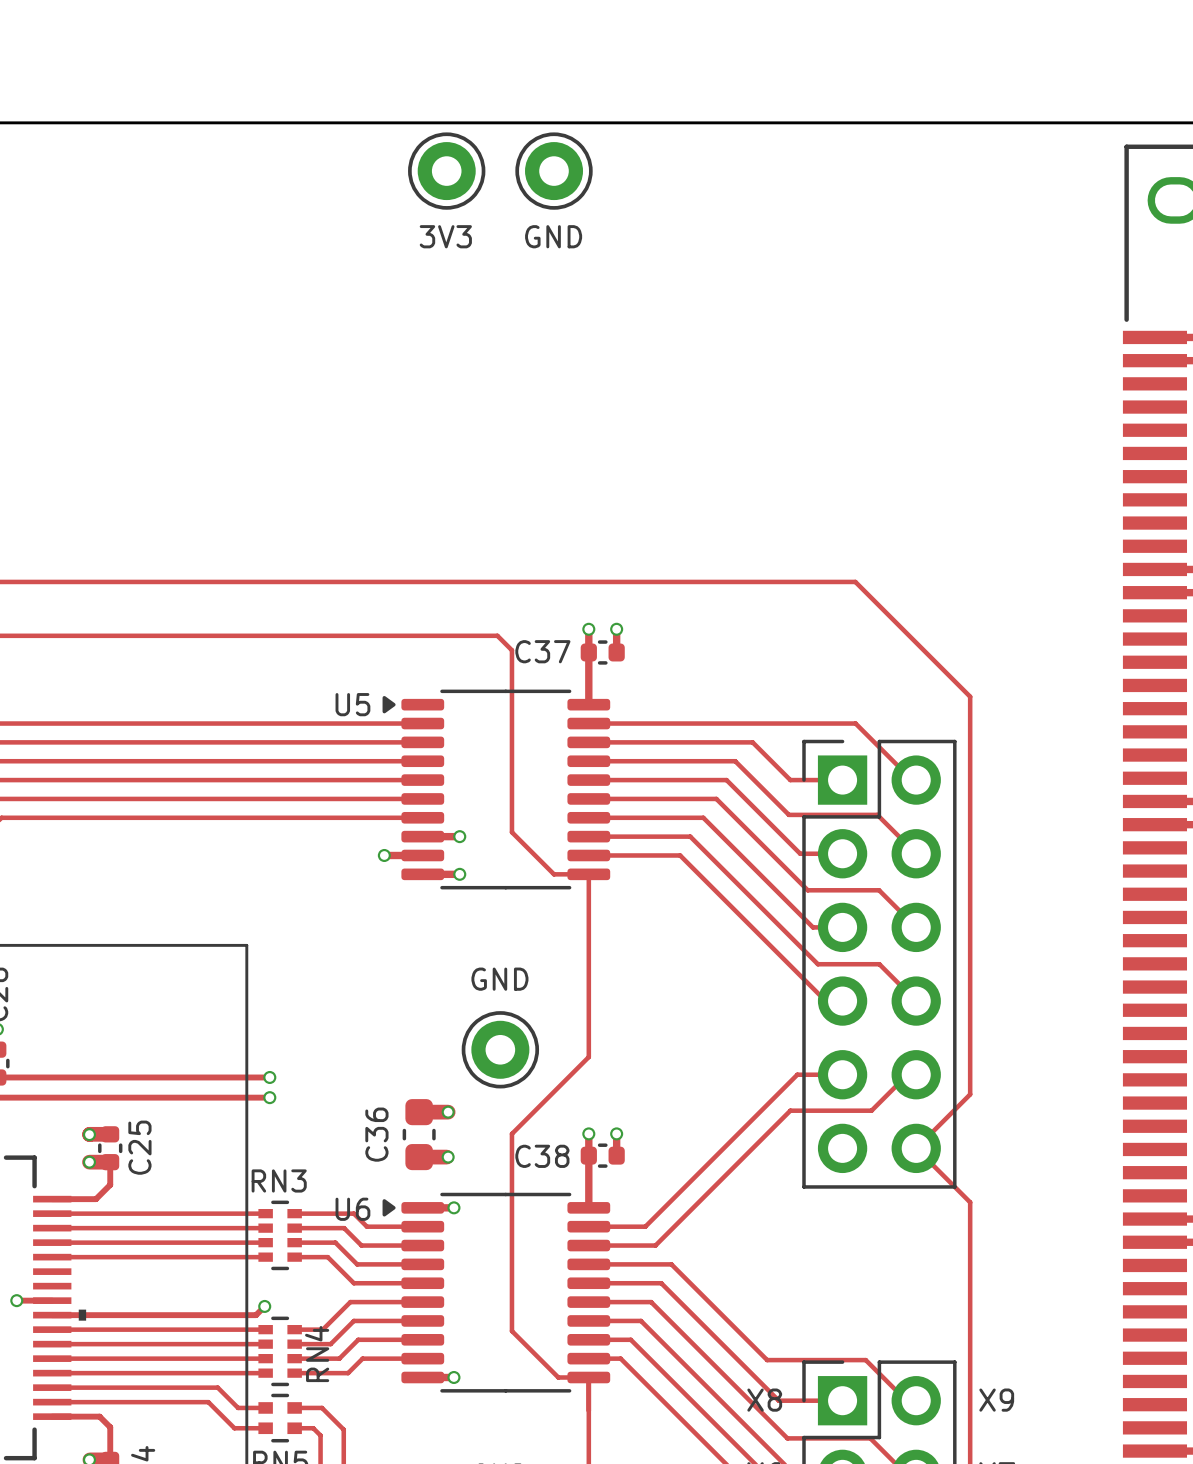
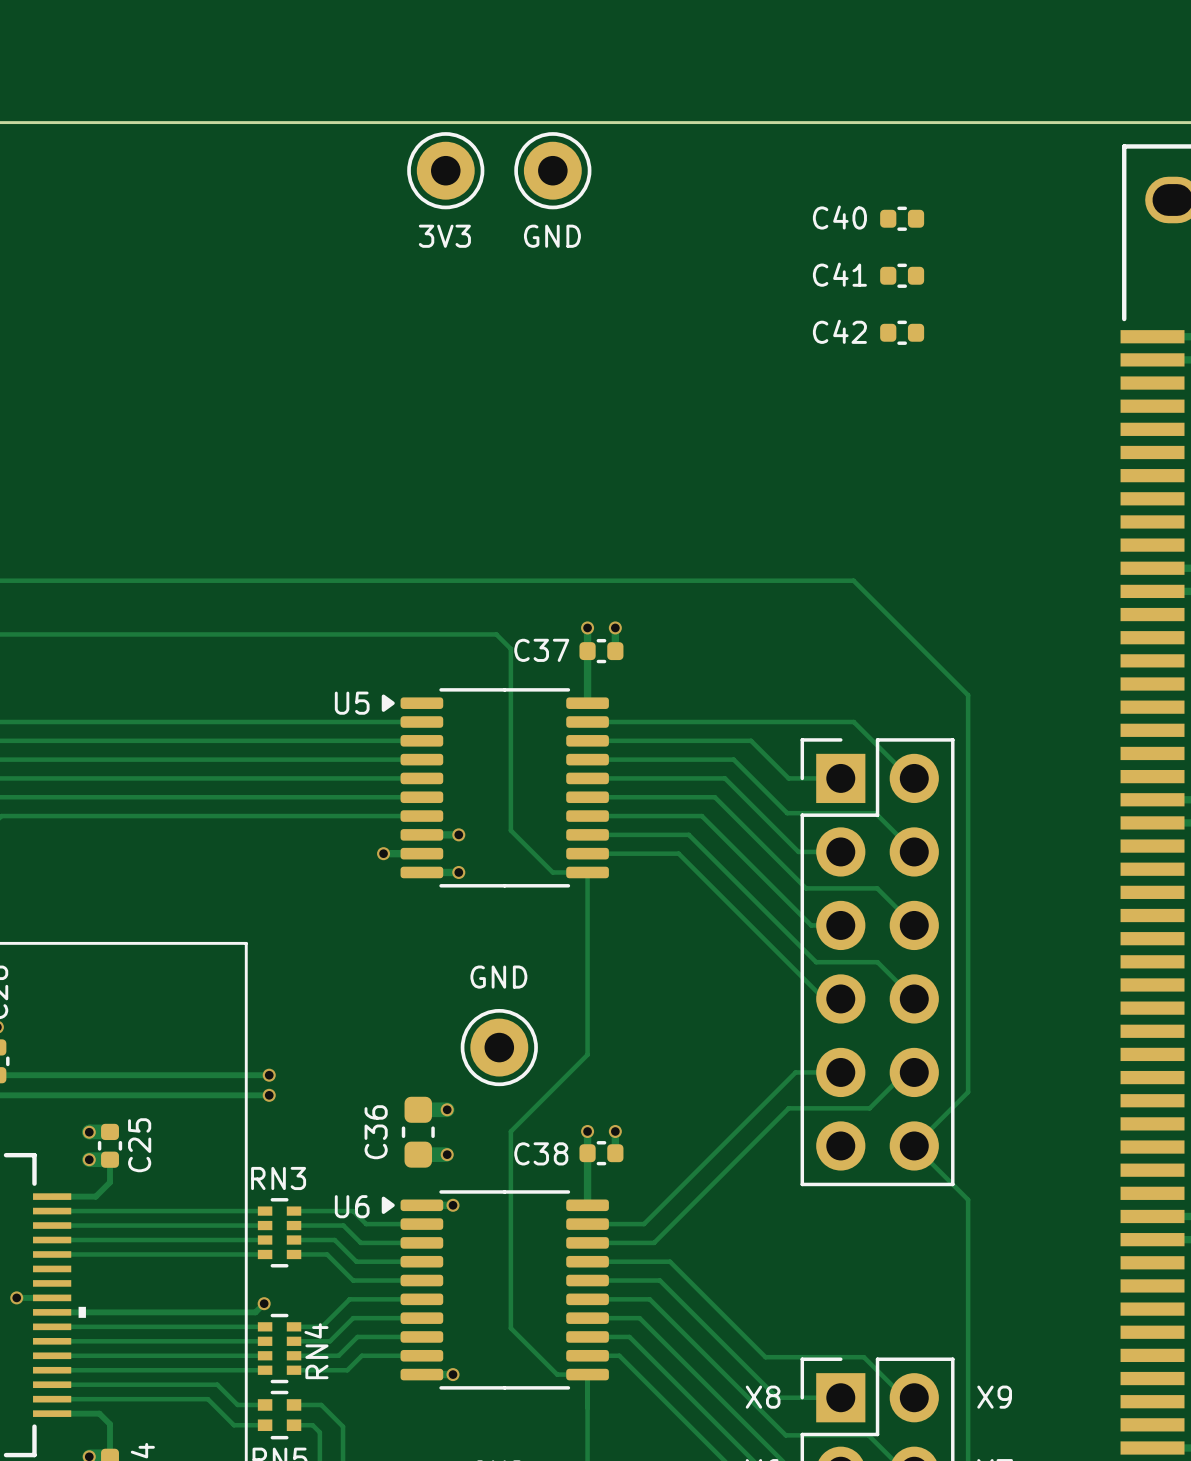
C40: none -> (902, 218)
C41: none -> (902, 275)
C42: none -> (902, 332)

